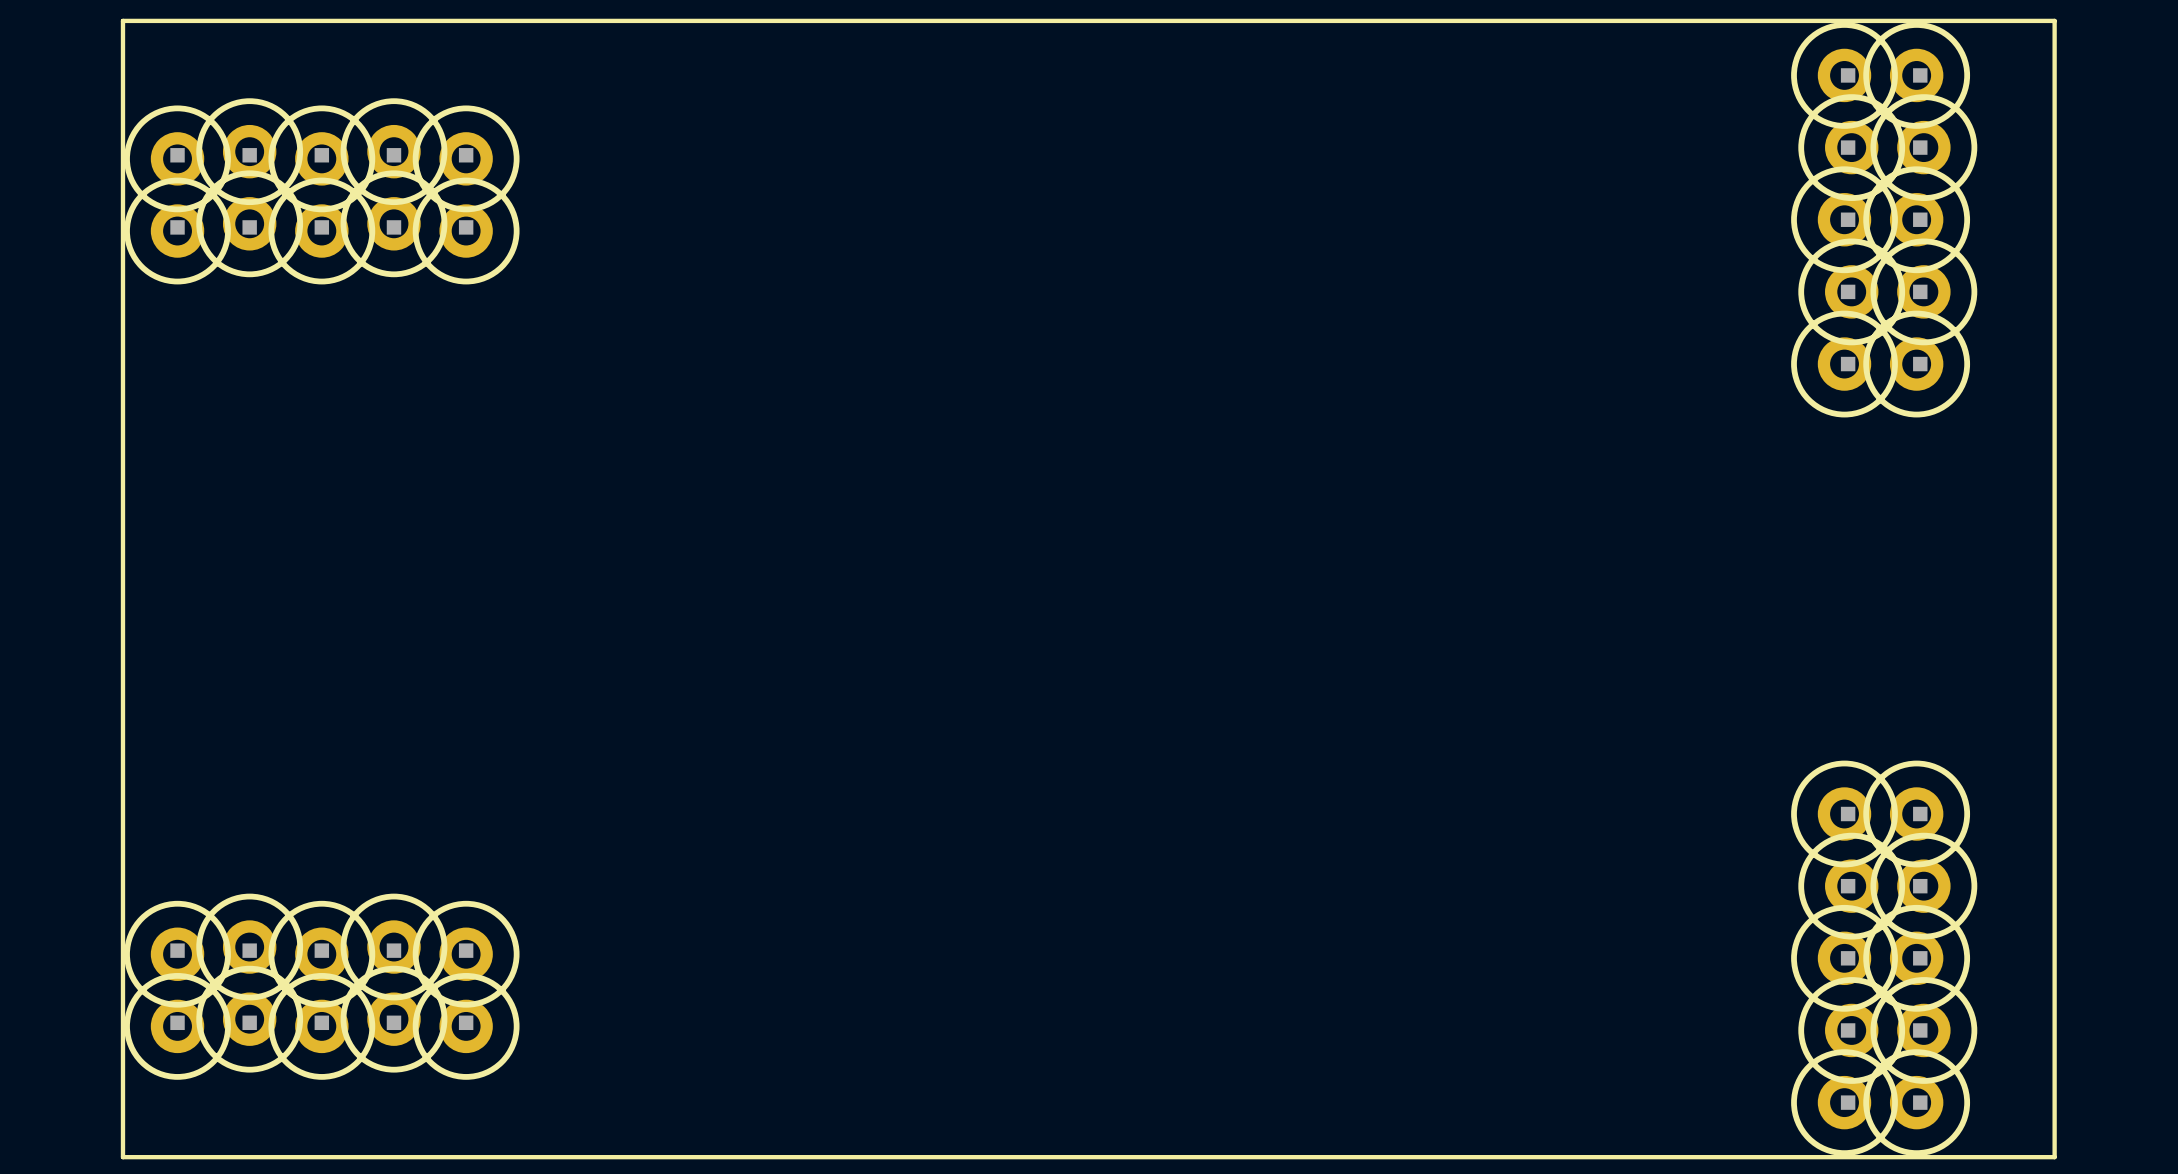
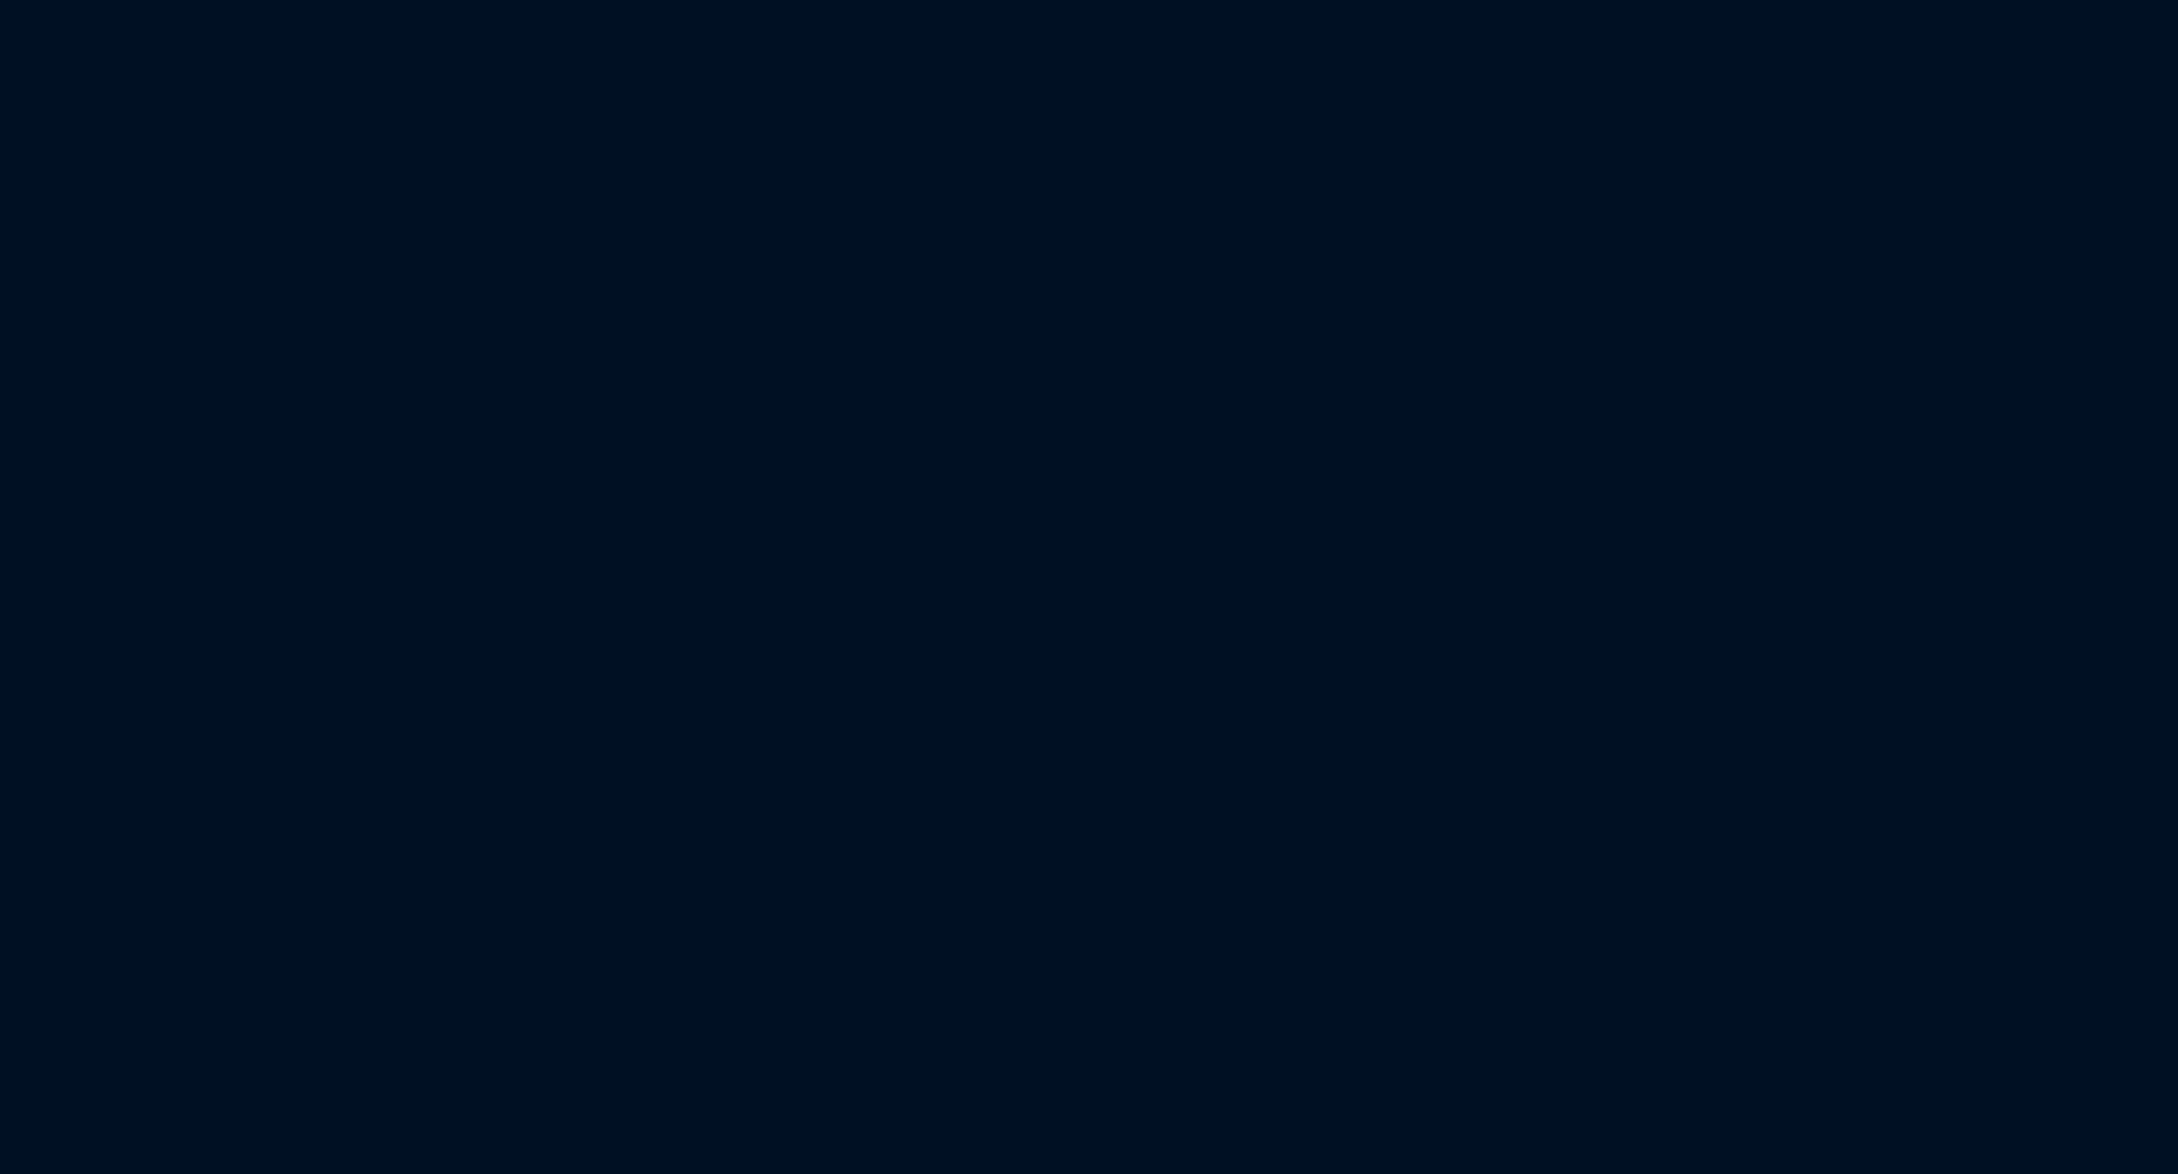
part: (1088, 589) -> none

